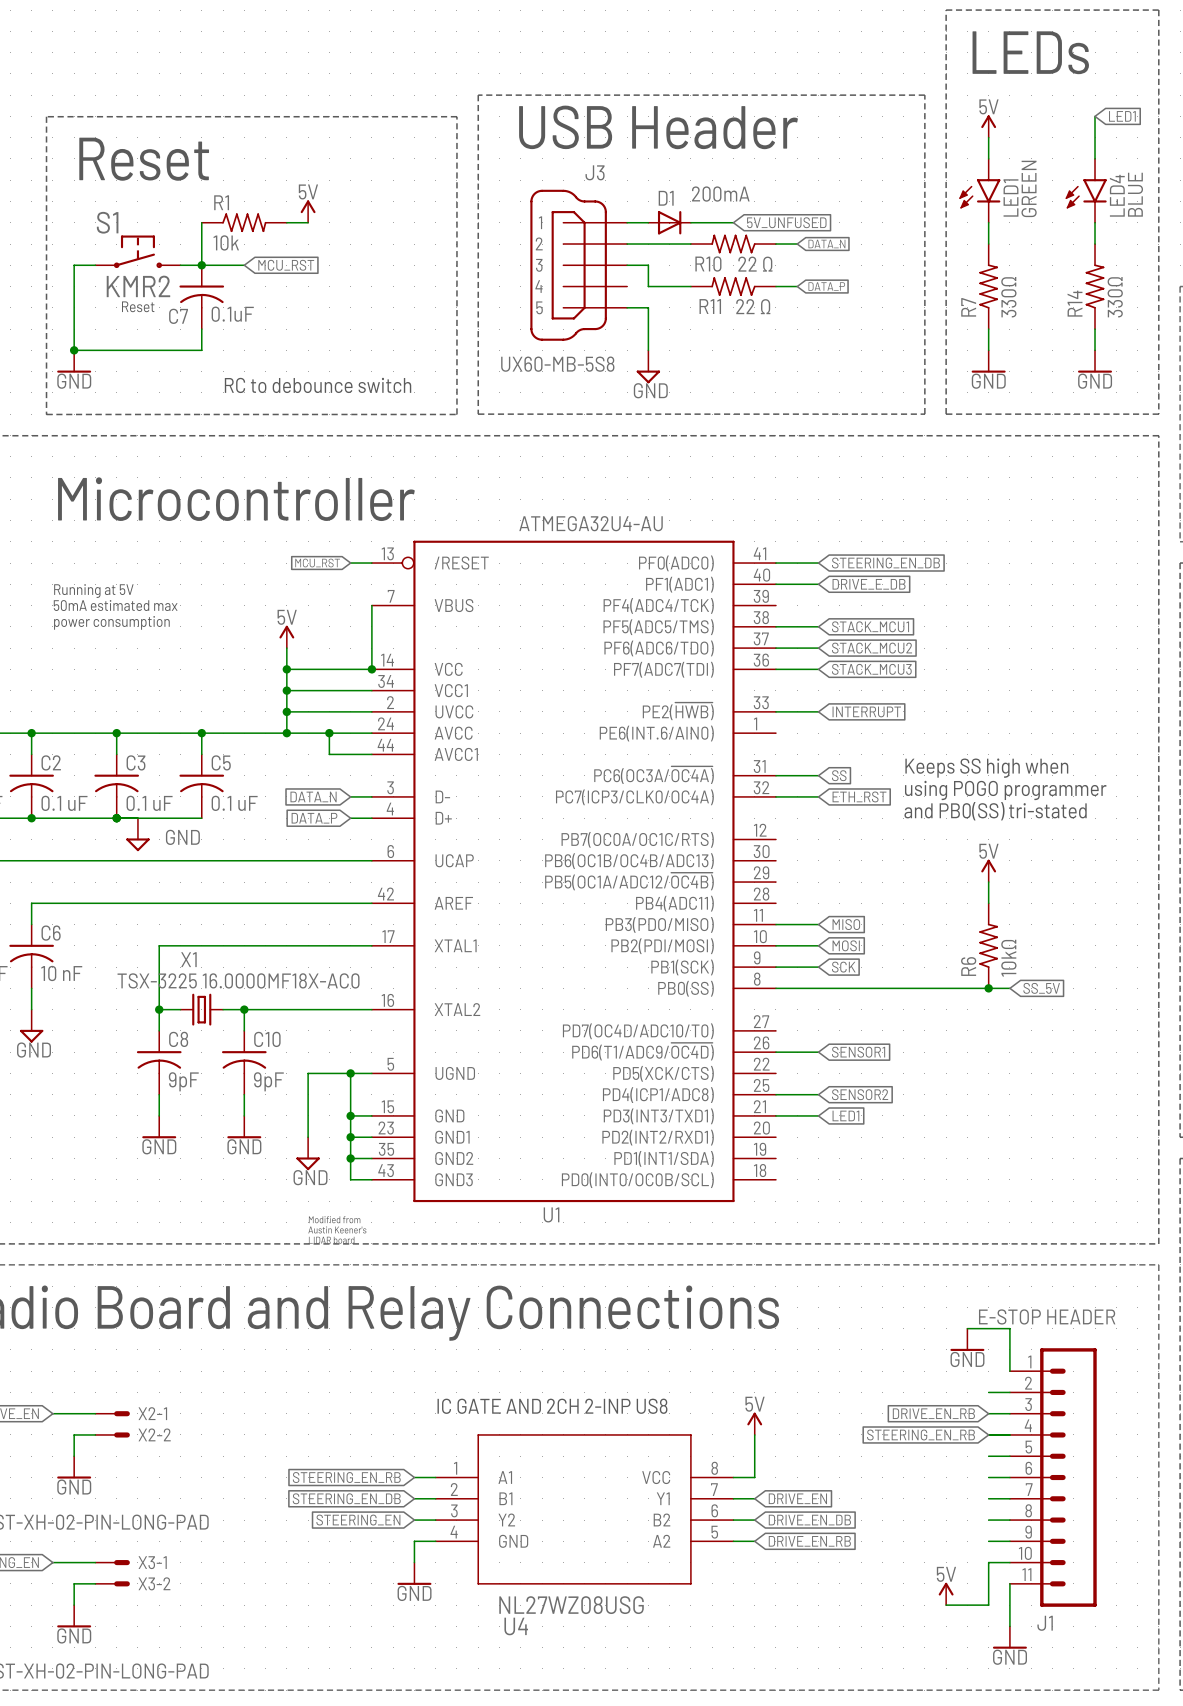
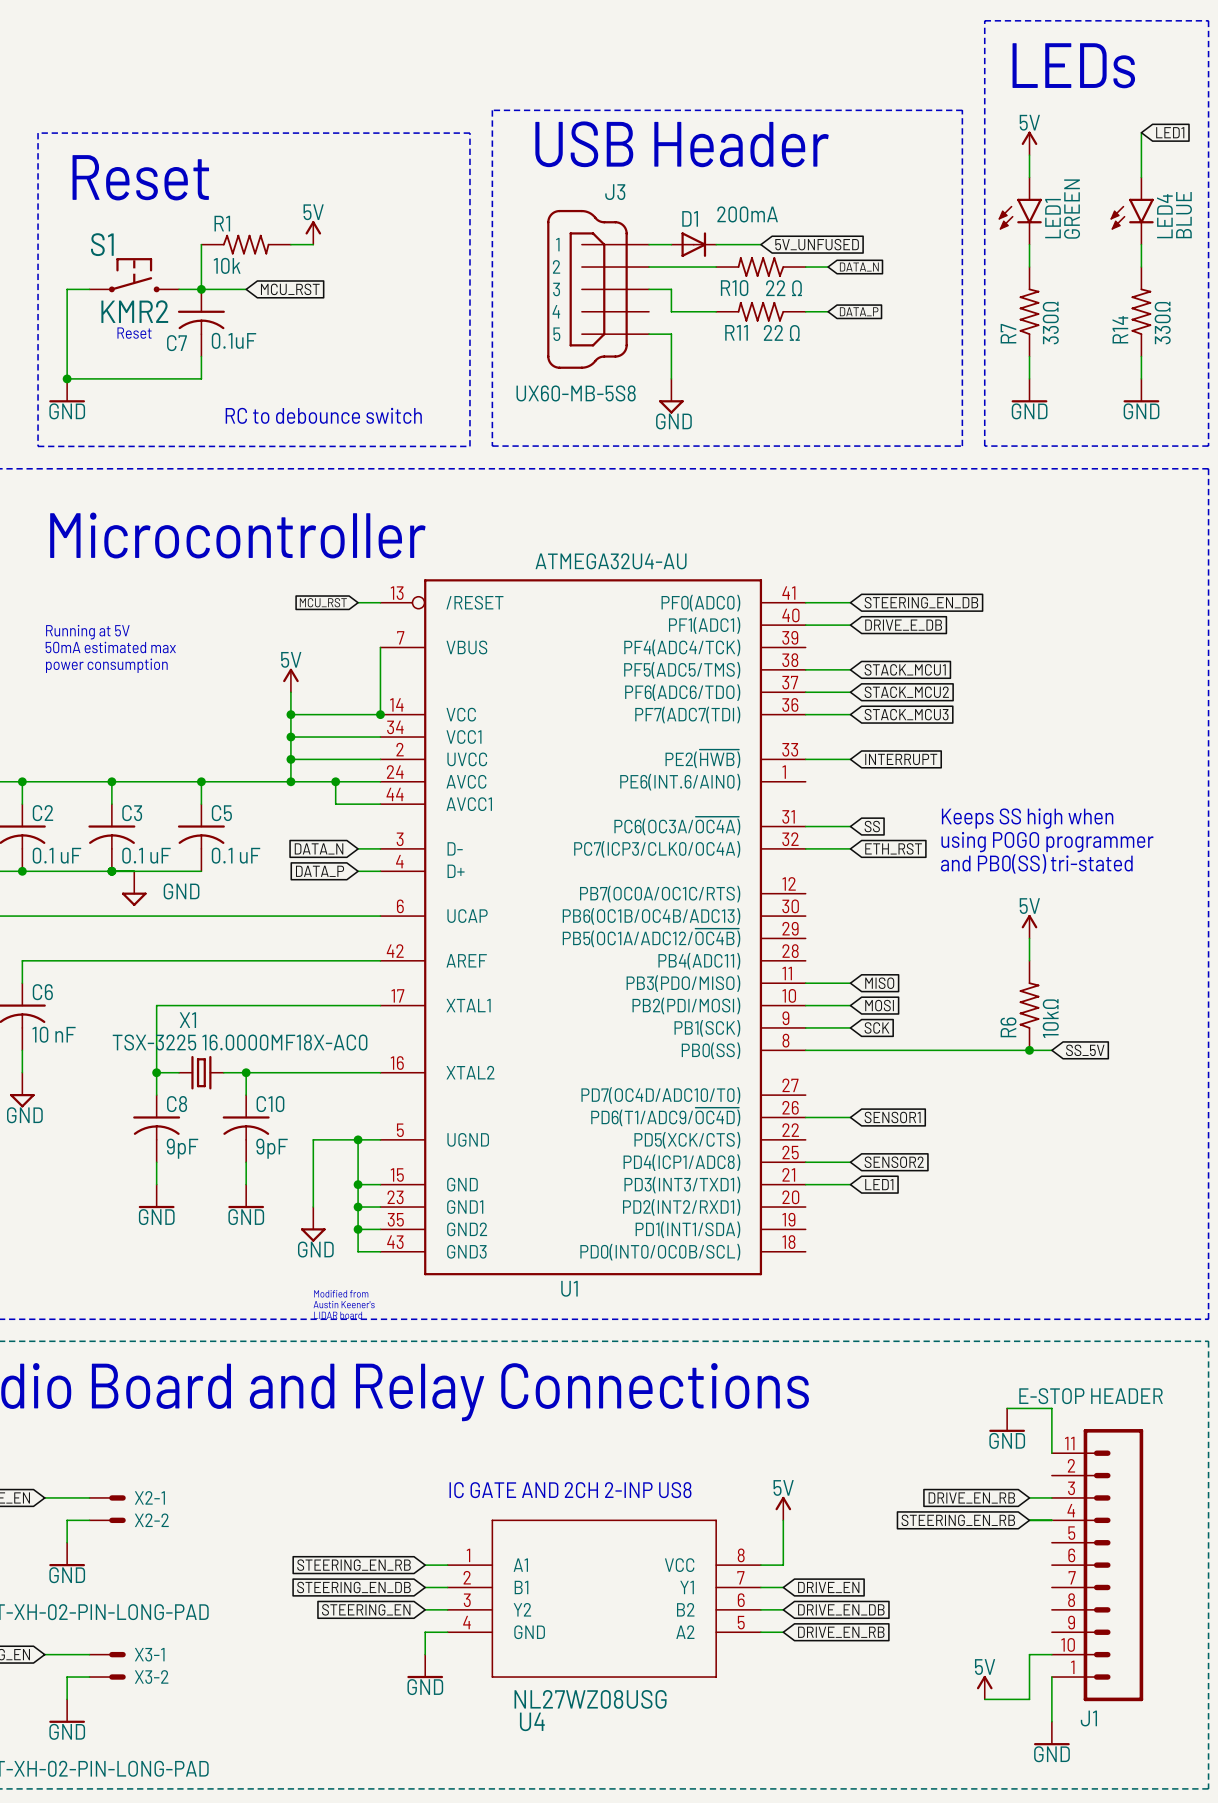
J1 pin number: 1 (1029, 1361) -> 11 (1069, 1443)
wire: (988, 1392) (1009, 1392) -> none
wire: (988, 1456) (1009, 1456) -> none
wire: (988, 1477) (1009, 1477) -> none
wire: (988, 1498) (1009, 1498) -> none
wire: (988, 1520) (1009, 1520) -> none
wire: (988, 1541) (1009, 1541) -> none
J1 pin number: 11 (1026, 1574) -> 1 (1072, 1667)

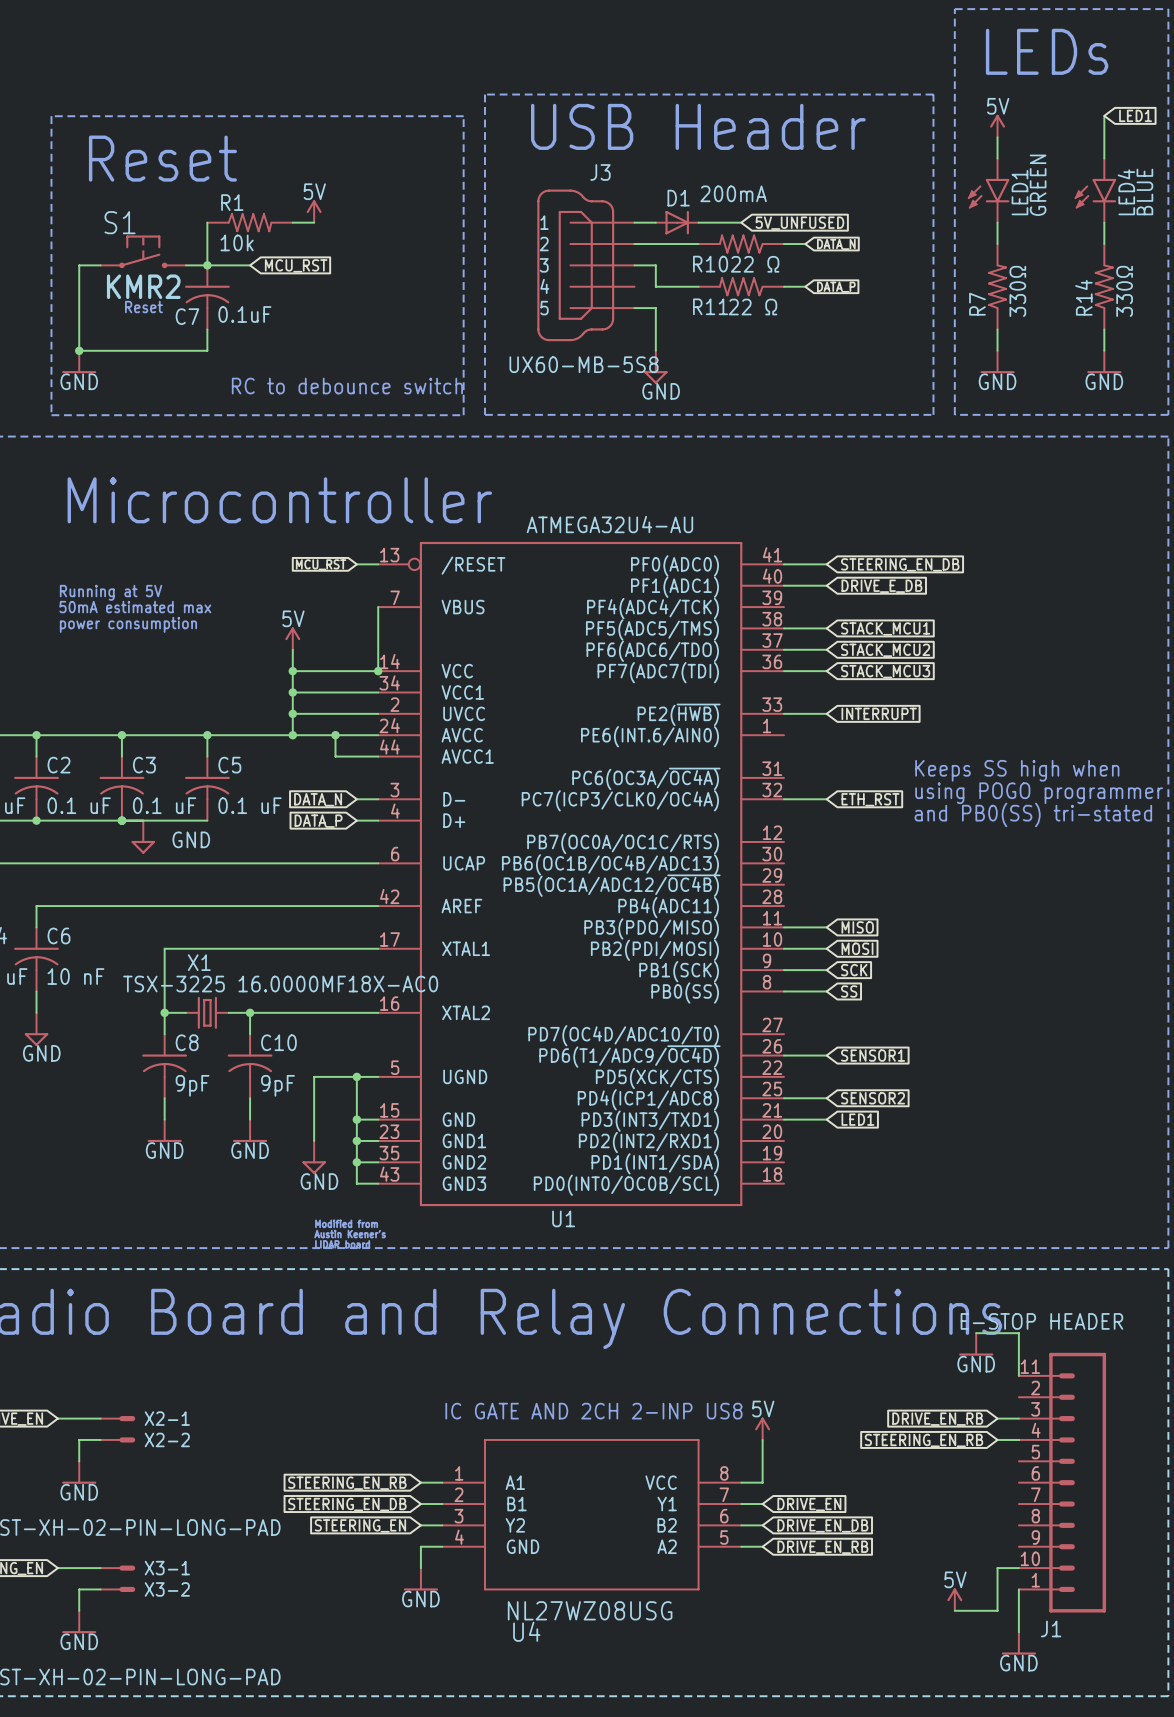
wire: (805, 826) (850, 826) -> none
global label: SS (872, 826) -> none
power symbol: 5V (1029, 926) -> none
wire: (1029, 938) (1029, 960) -> none
R6: 10kΩ (1029, 1005) -> none
wire: (850, 1050) (1051, 1050) -> none
global label: none -> SS (849, 991)
junction: (1029, 1050) -> none
global label: SS_5V (1085, 1050) -> none

